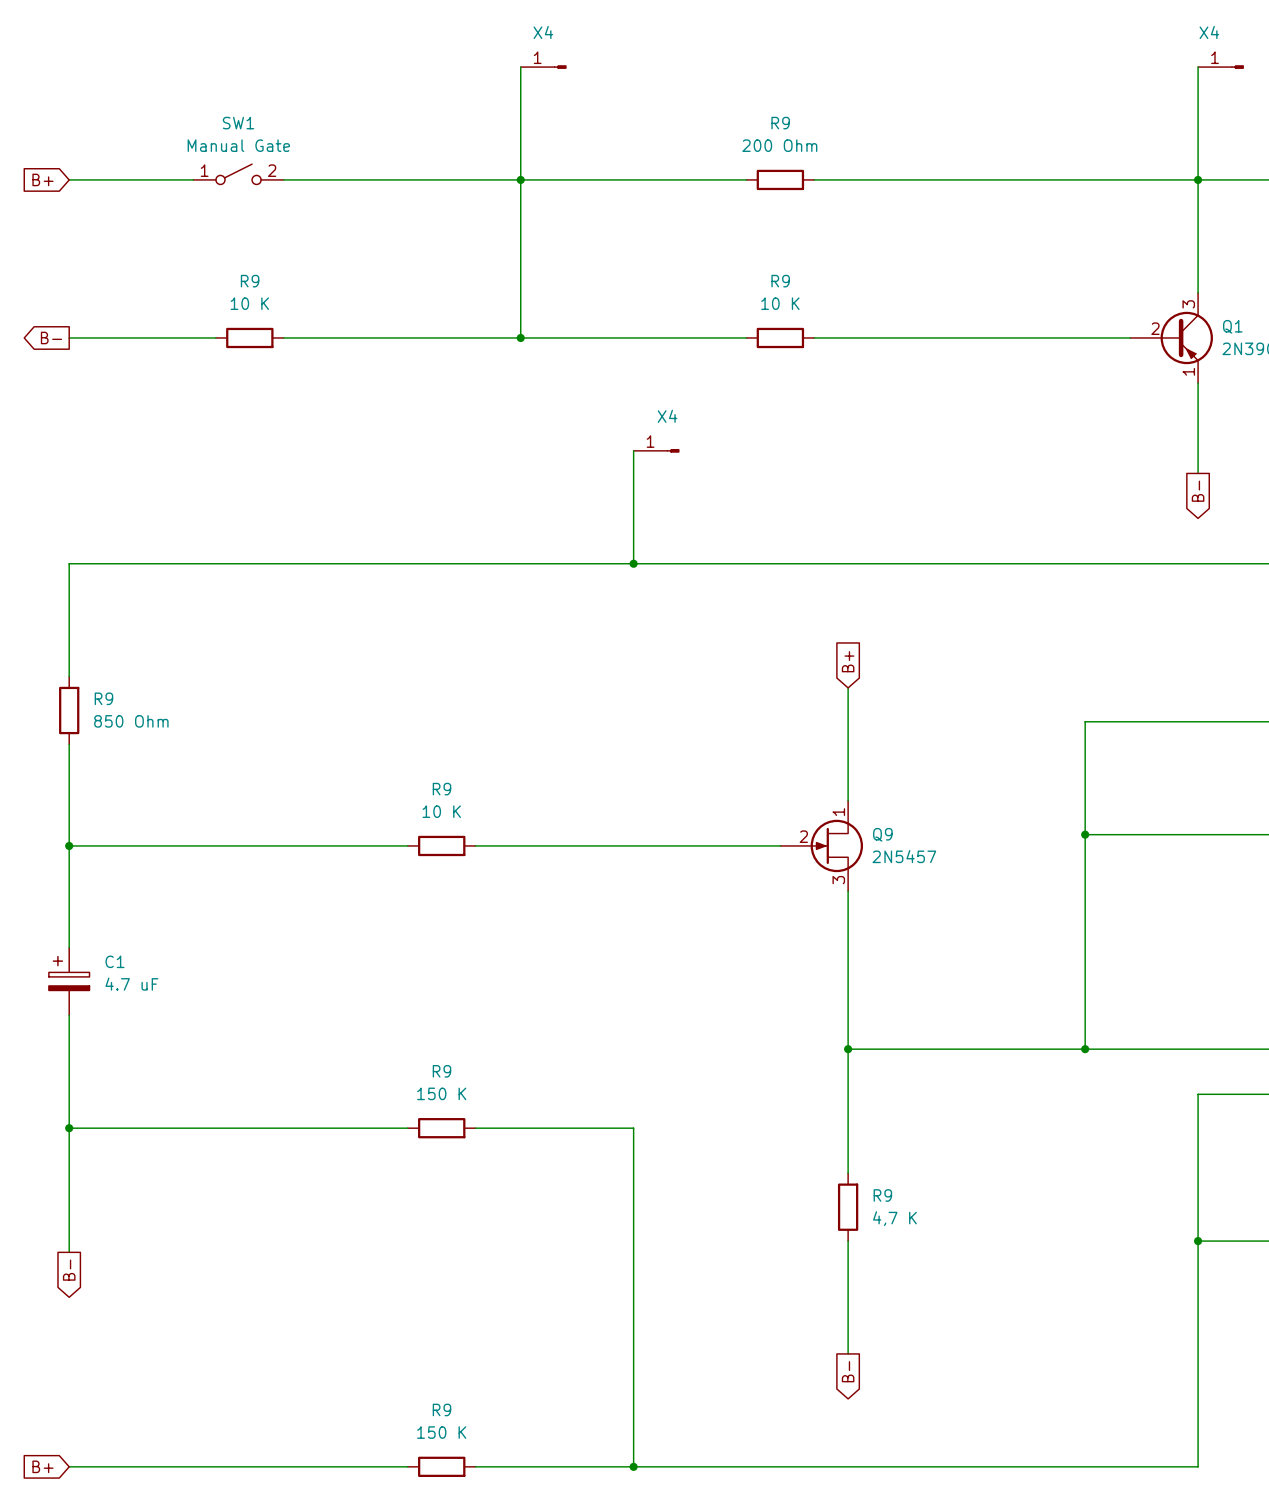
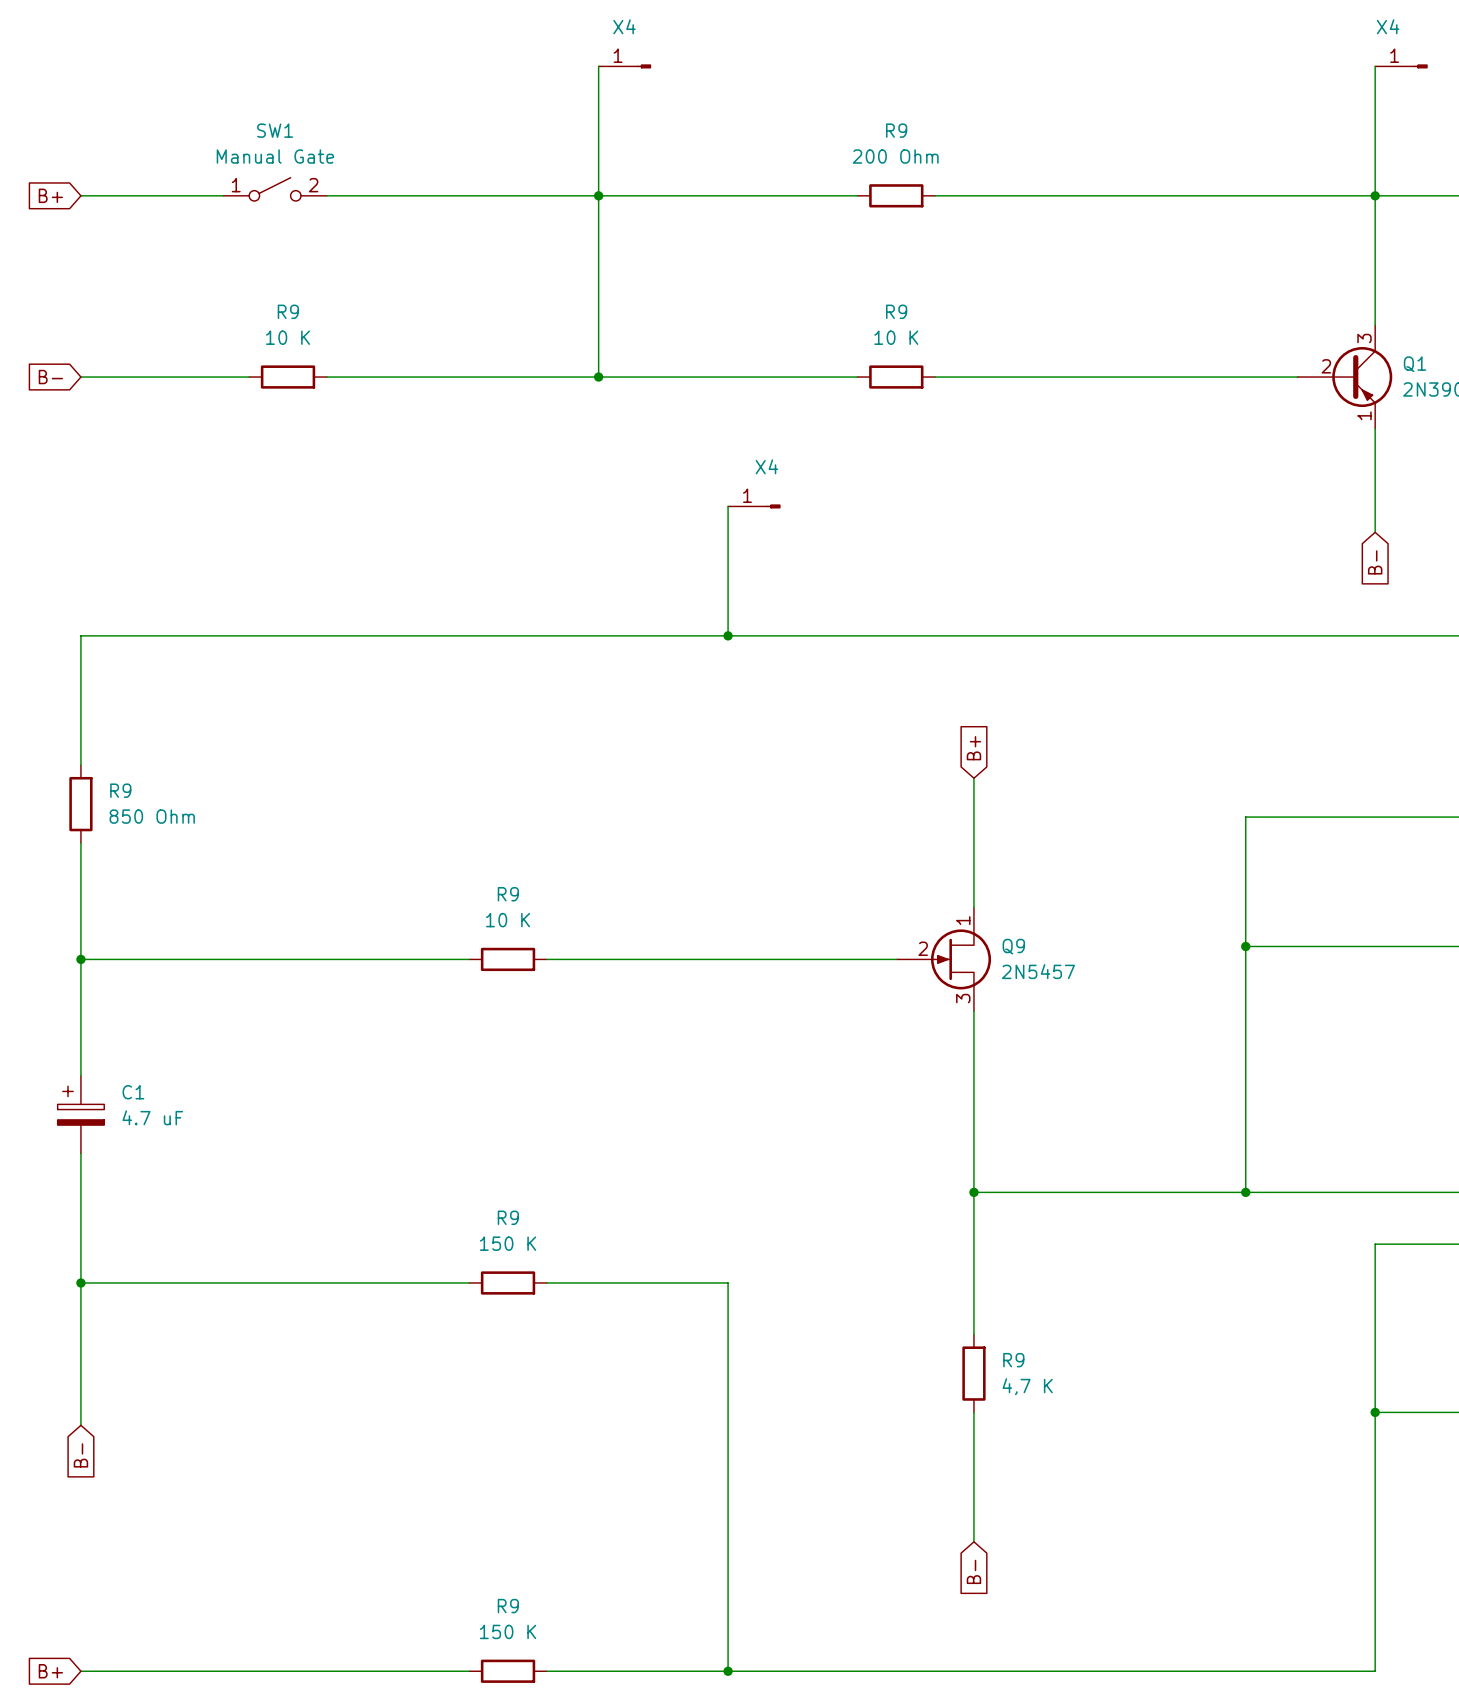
global label shape: output (51, 337) -> input (50, 377)
global label shape: output (1198, 491) -> input (1375, 562)
global label shape: output (69, 1270) -> input (80, 1455)
global label shape: output (848, 1371) -> input (973, 1571)

